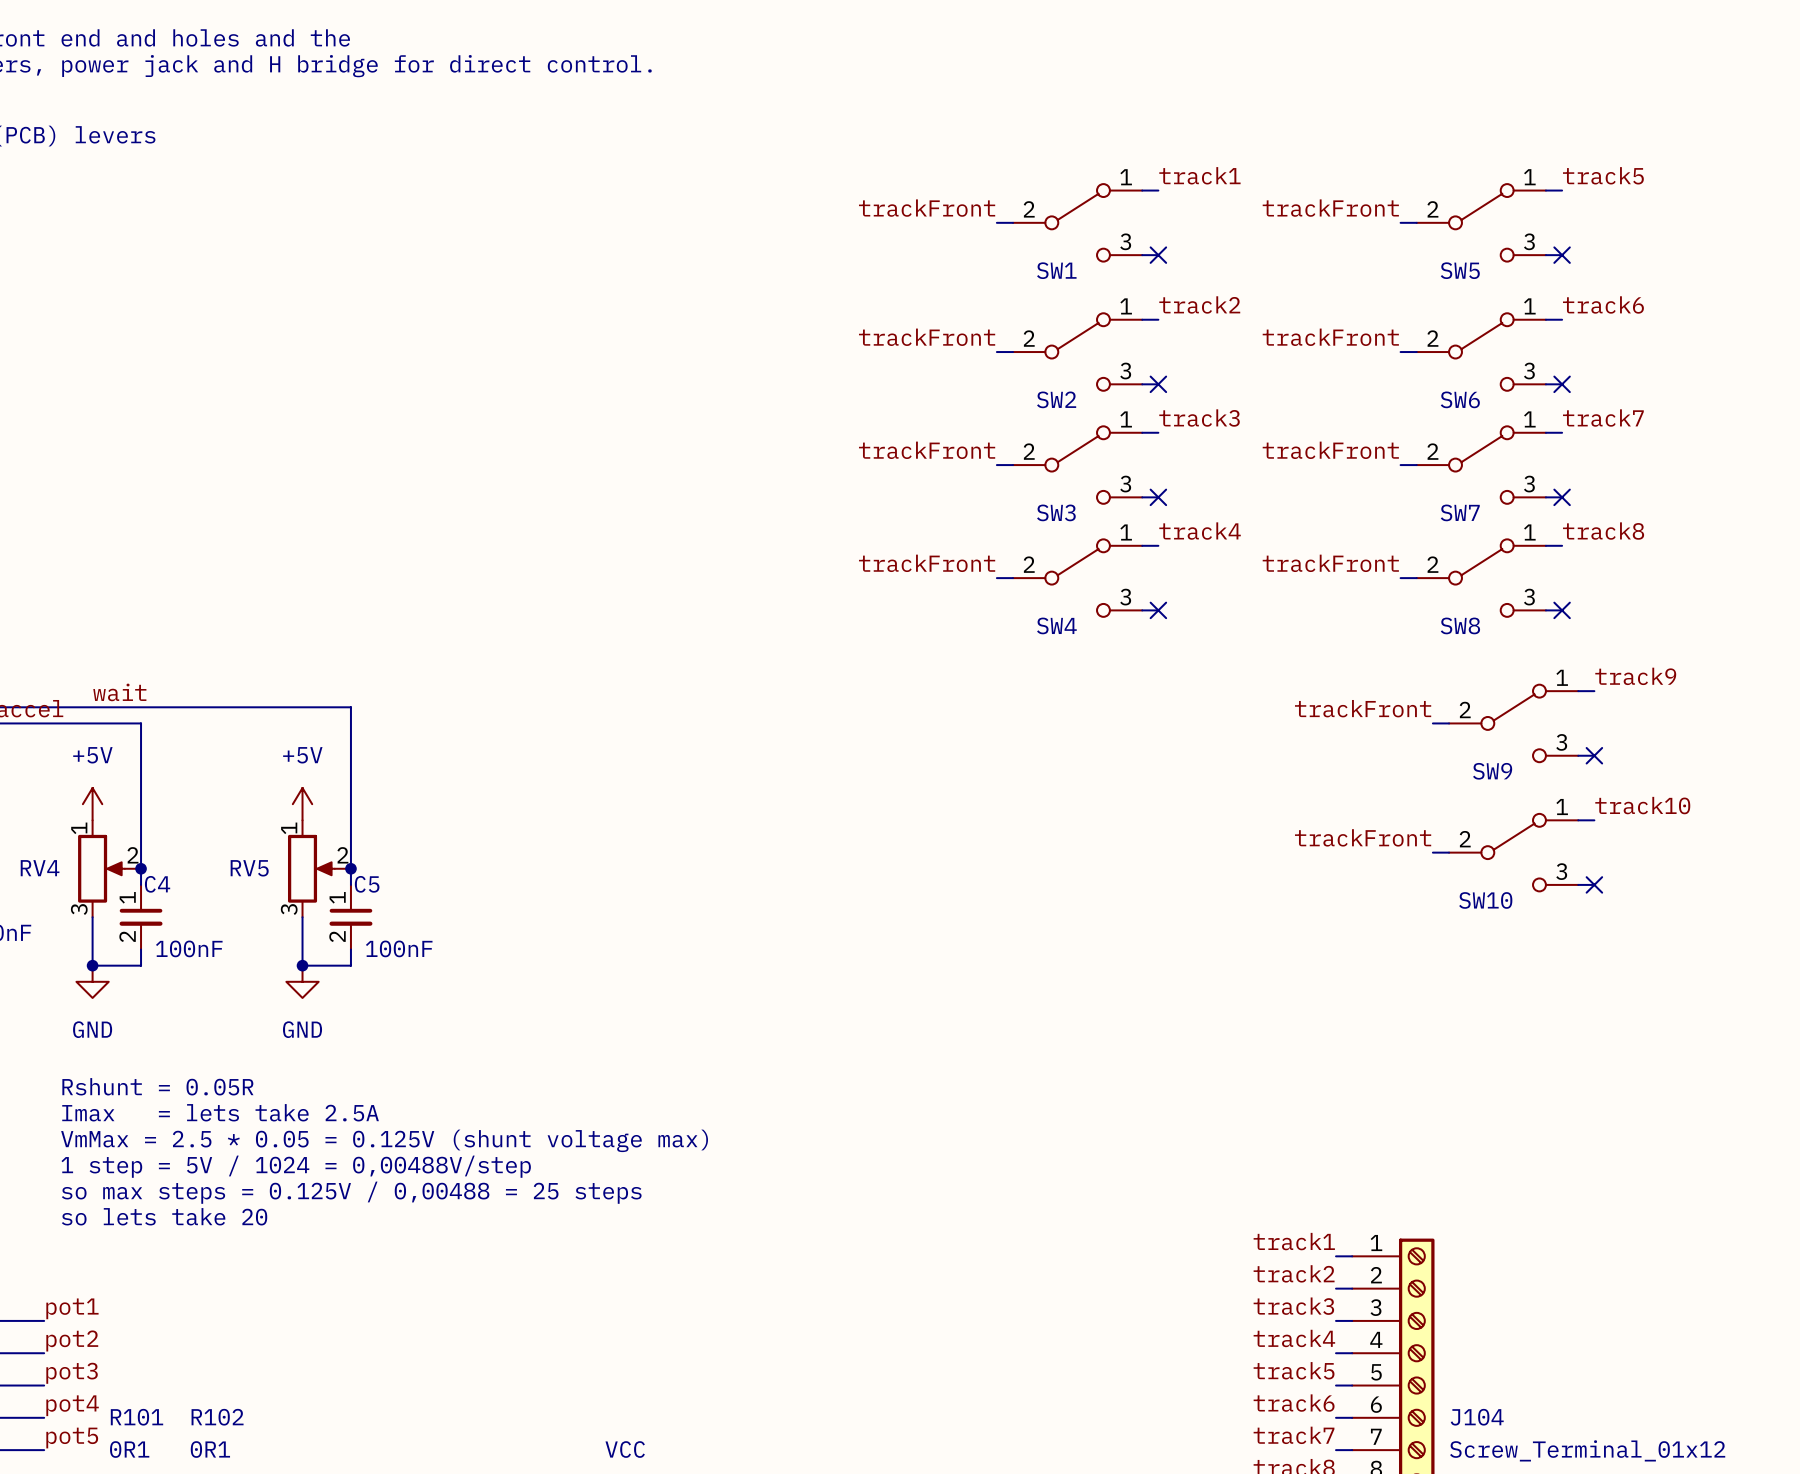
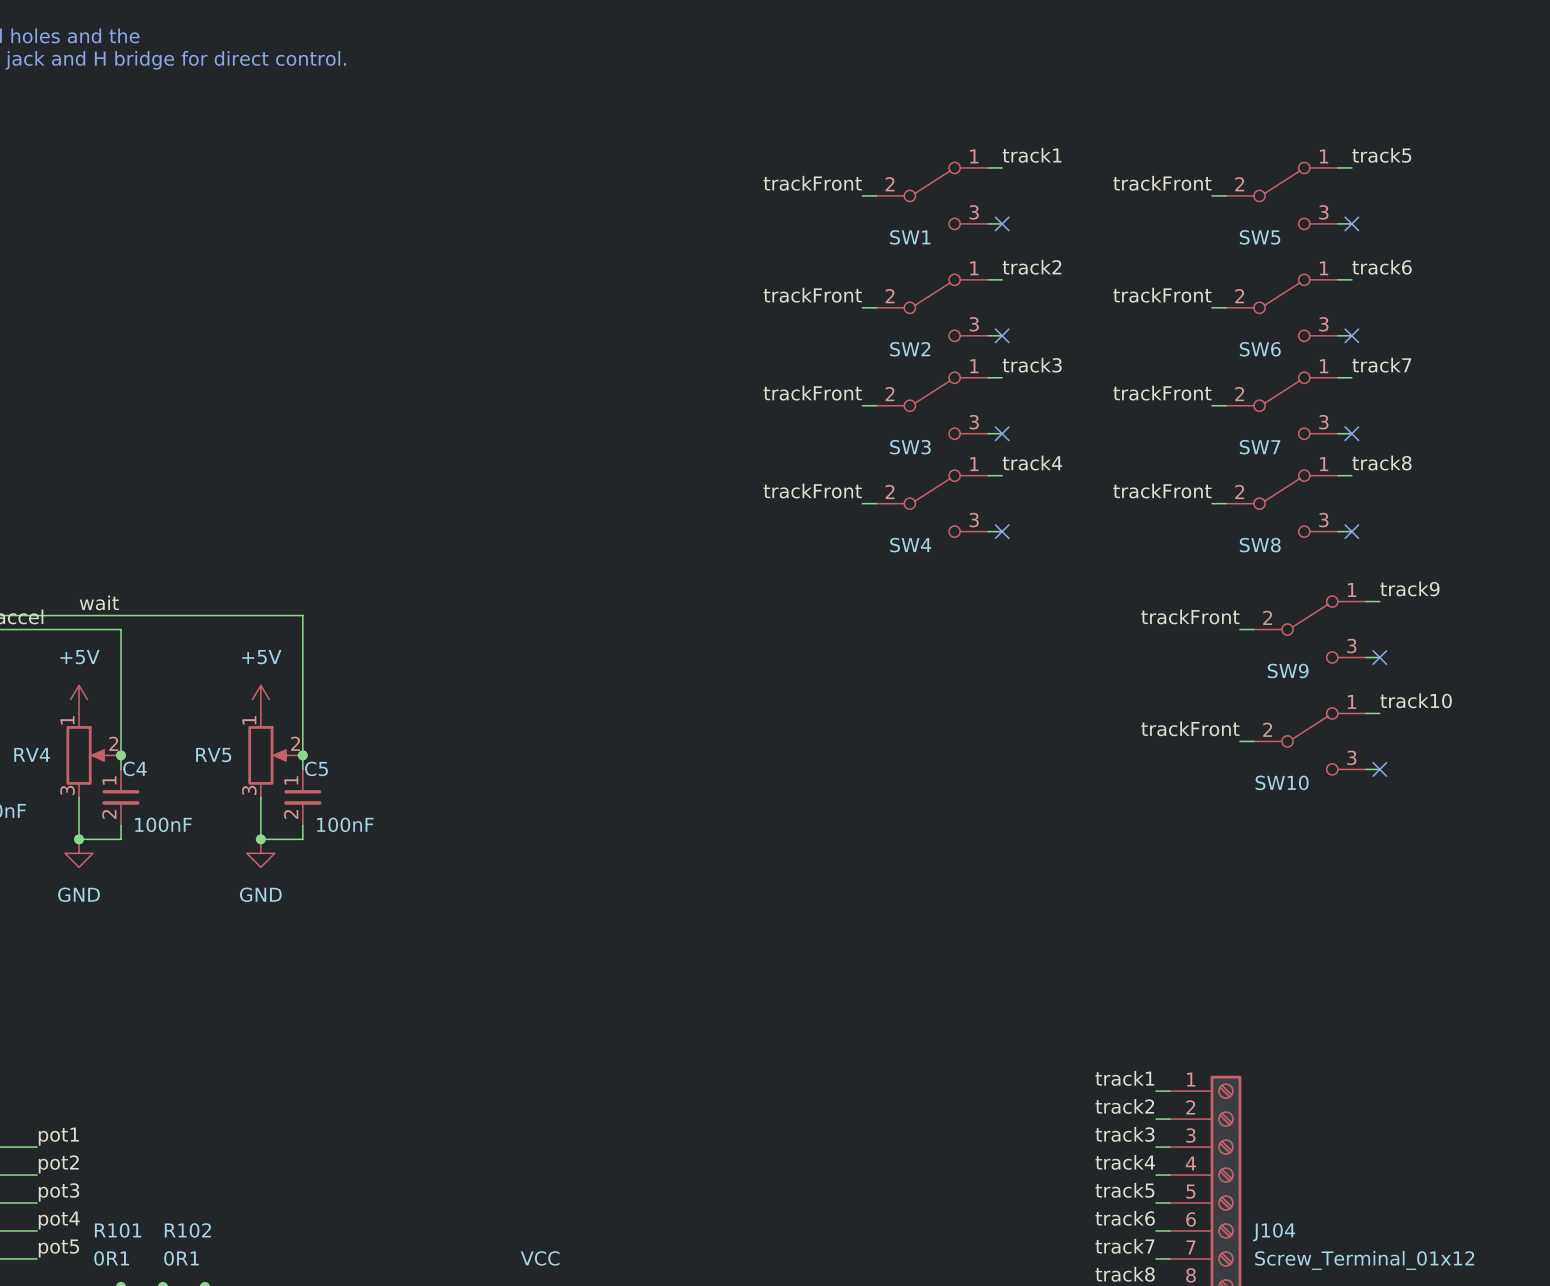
text: Rshunt = 0.05R (157, 1086) -> none
text: Imax = lets take 2.5A (220, 1112) -> none
text: VmMax = 2.5 * 0.05 = 0.125V (shunt voltage max) (384, 1140) -> none
text: 1 step = 5V / 1024 = 0,00488V/step (296, 1166) -> none
text: so max steps = 0.125V / 0,00488 = 25 steps (351, 1192) -> none
text: so lets take 20 (164, 1216) -> none

